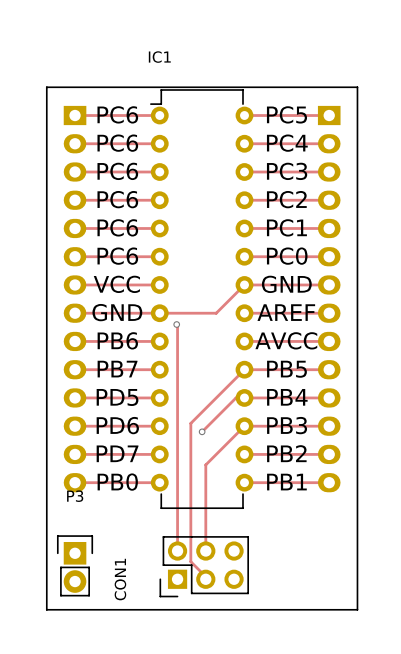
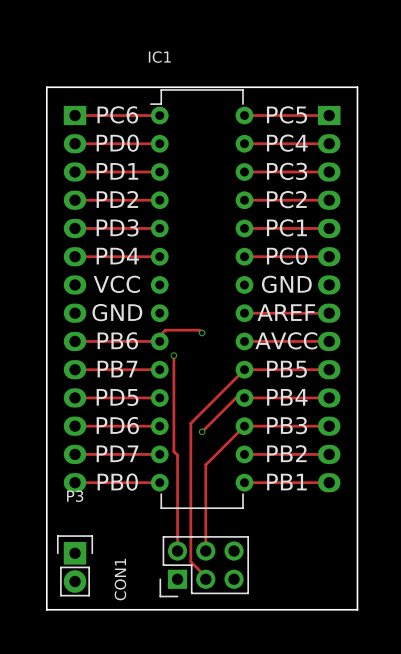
text: PC6 (117, 143) -> PD0 (117, 143)
text: PC6 (117, 171) -> PD1 (117, 171)
text: PC6 (117, 199) -> PD2 (117, 199)
text: PC6 (117, 227) -> PD3 (117, 227)
text: PC6 (117, 256) -> PD4 (117, 256)
track: (75, 284) (159, 284) -> none
track: (329, 284) (244, 284) (216, 313) (75, 313) -> none
track: (176, 324) (177, 455) -> (173, 355) (173, 451) (177, 455)
via: (176, 324) -> none
track: none -> (202, 332) (199, 330) (165, 330) (156, 338)
via: none -> (202, 332)
via: none -> (173, 355)

